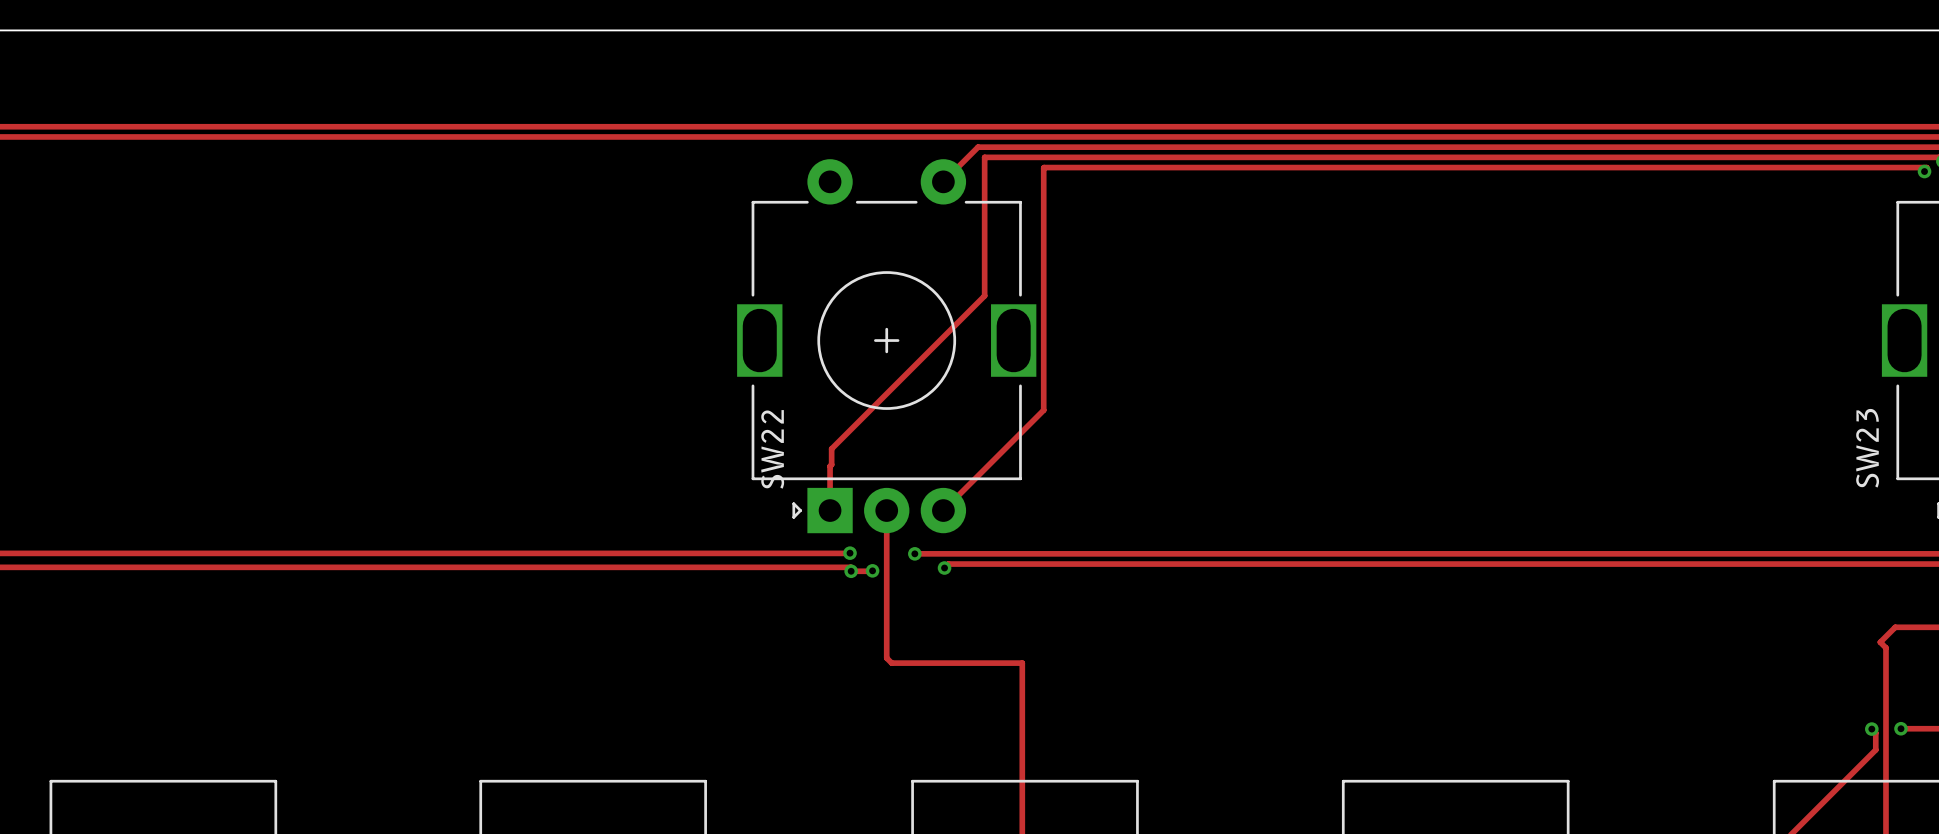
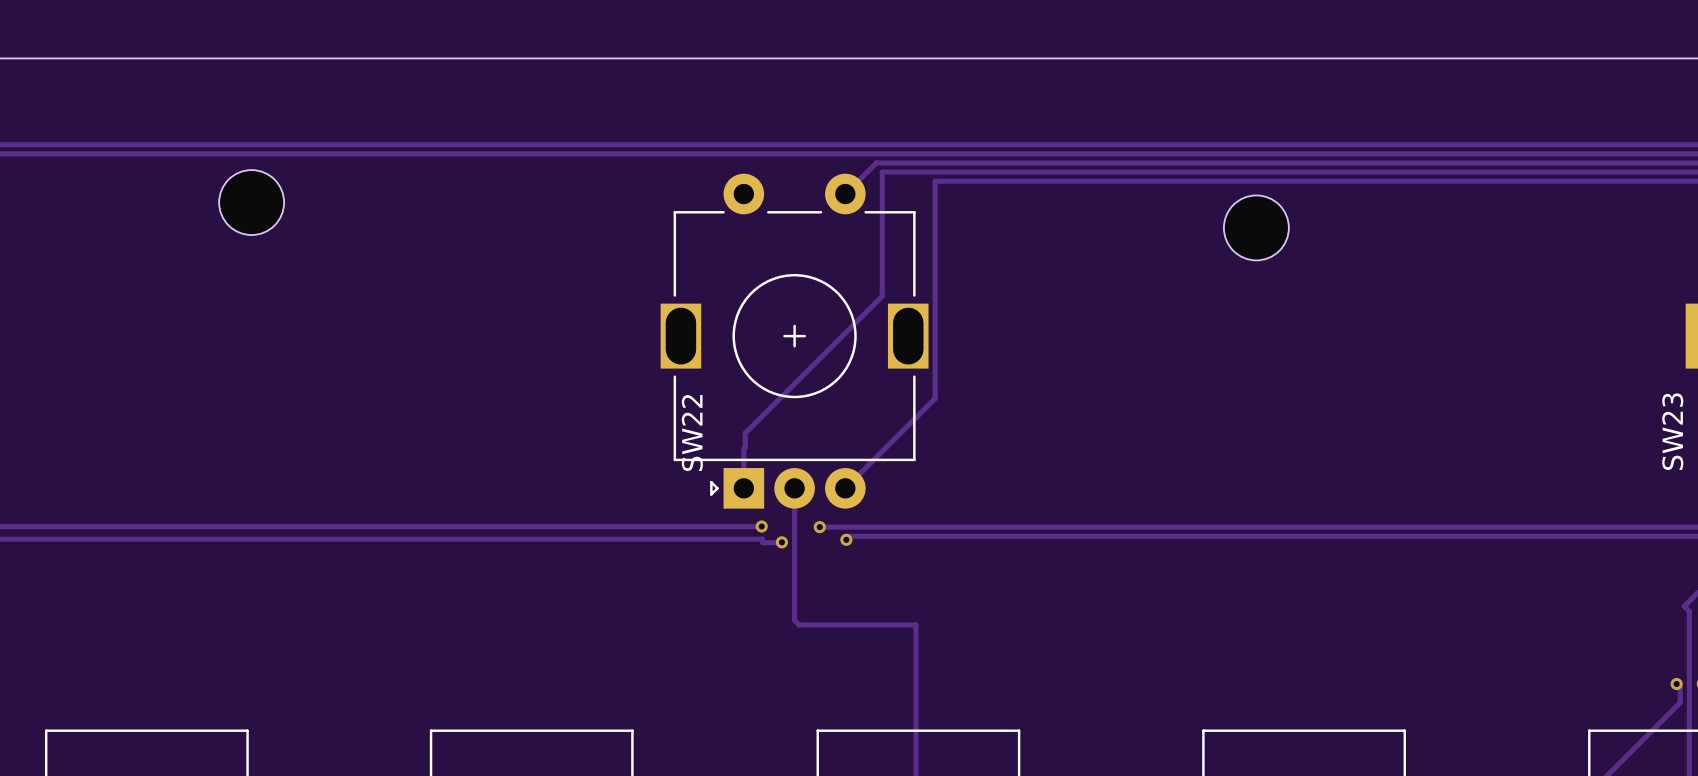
part: none -> (251, 202)
part: none -> (1256, 227)
via: (851, 571) -> none

